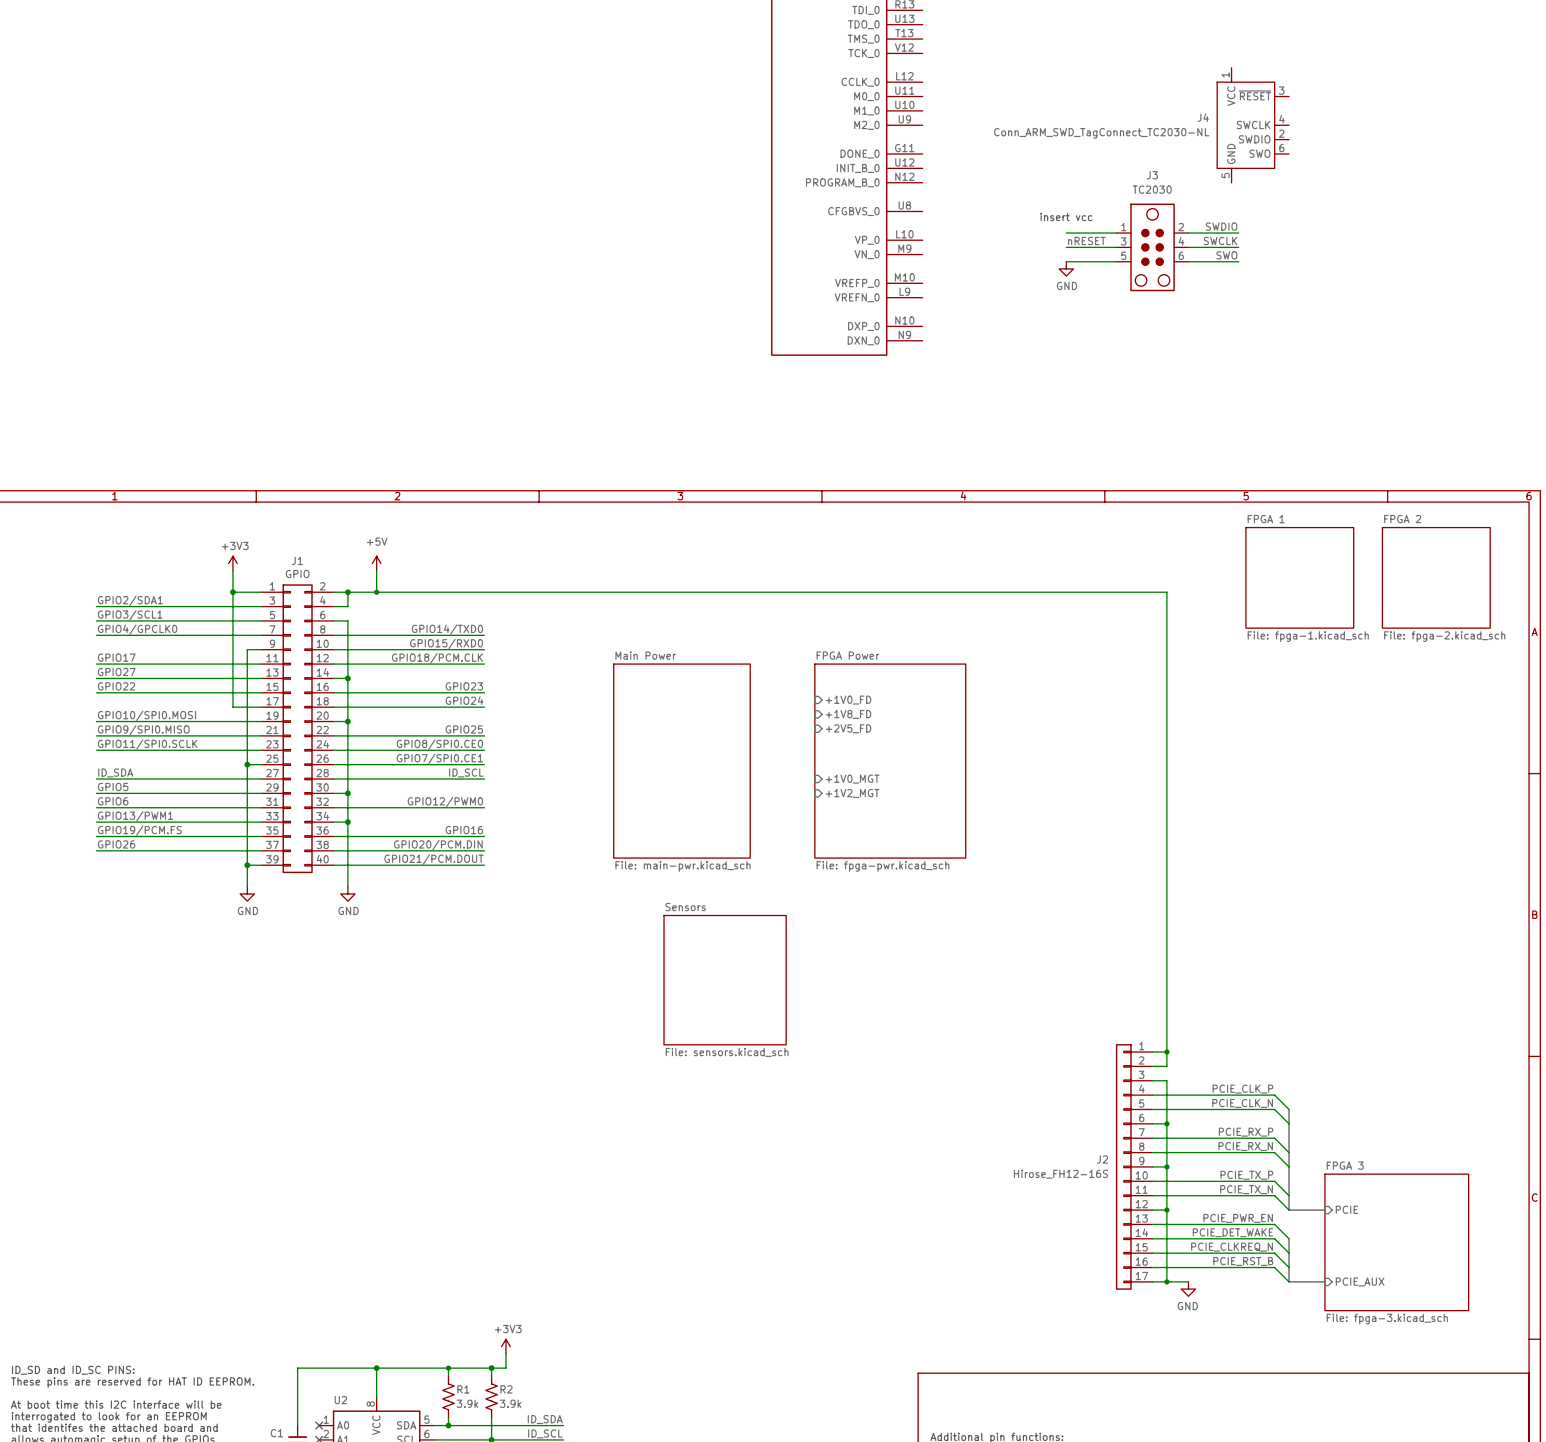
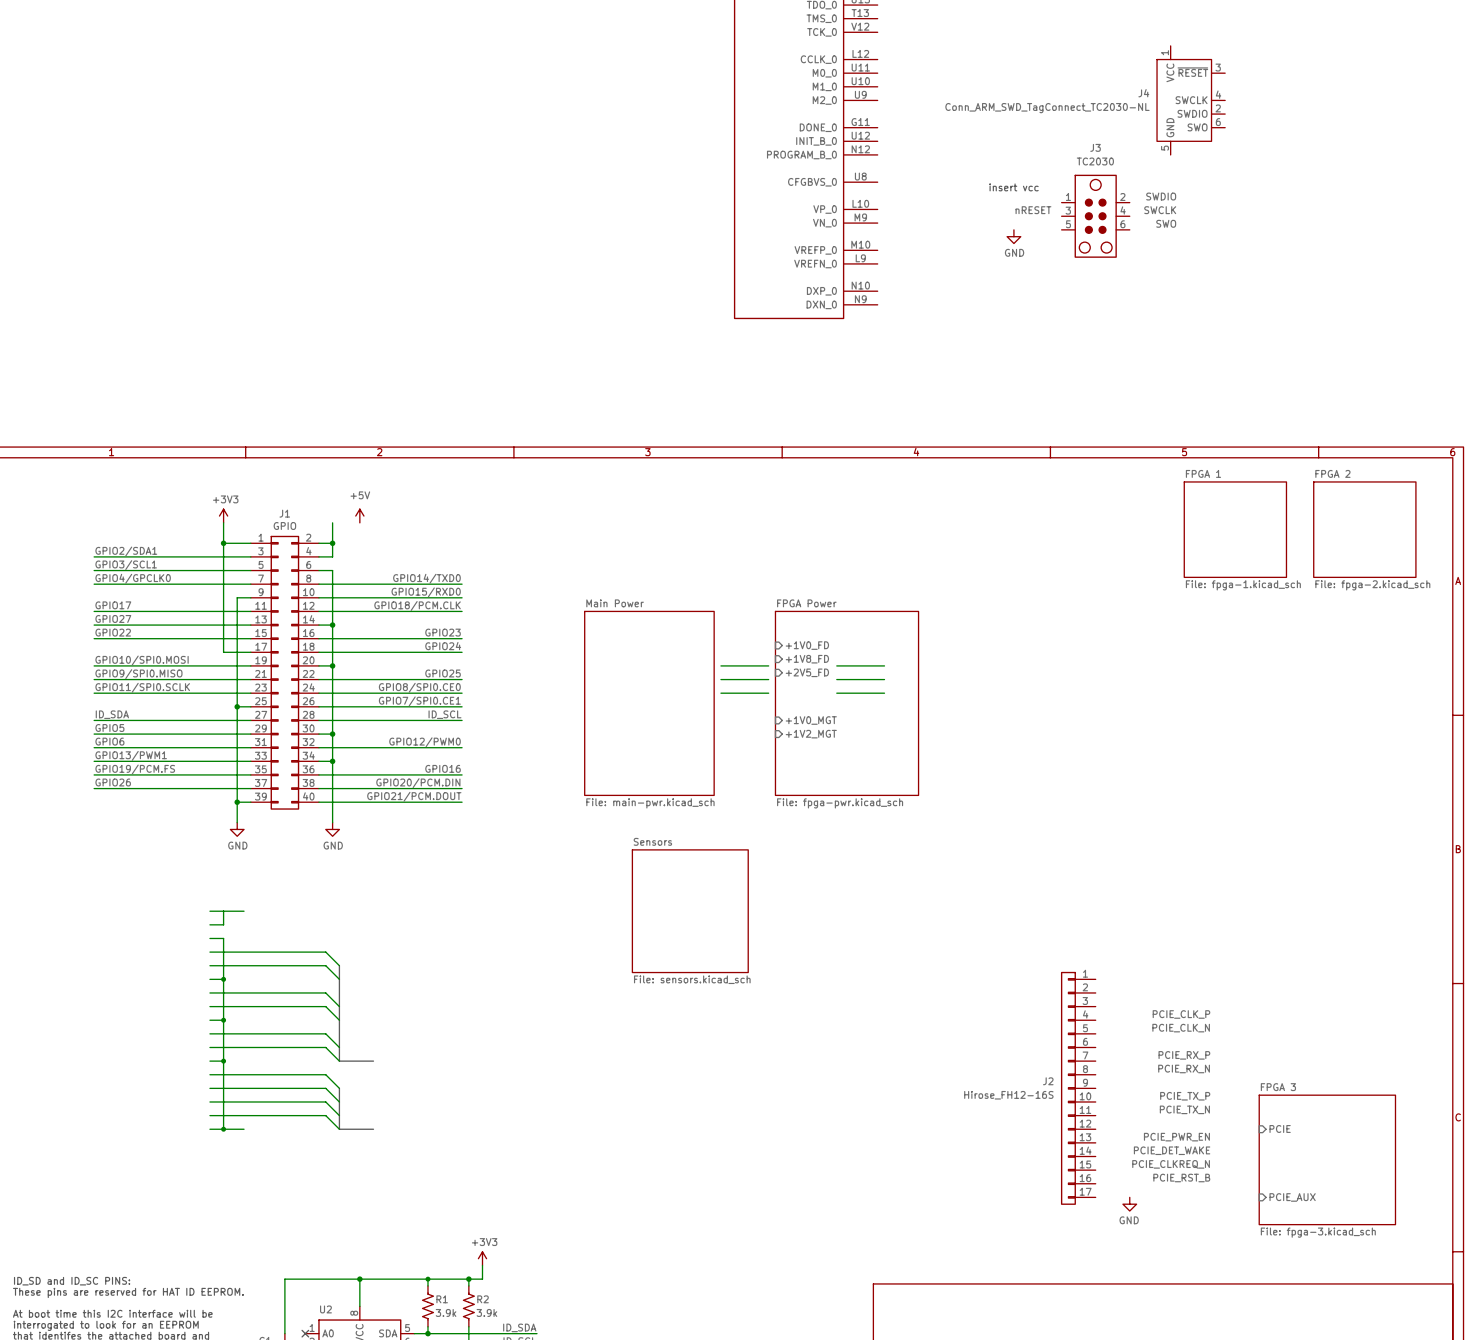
wire: (1066, 233) (1116, 233) -> none
wire: (1188, 233) (1238, 233) -> none
wire: (1066, 247) (1116, 247) -> none
wire: (1188, 247) (1238, 247) -> none
wire: (1066, 261) (1116, 261) -> none
wire: (1188, 261) (1238, 261) -> none
wire: (376, 570) (376, 592) -> none
wire: (347, 592) (1166, 592) (1166, 1066) (1152, 1066) -> (332, 543) (332, 522)
junction: (376, 592) -> none
wire: none -> (720, 665) (768, 665)
wire: none -> (836, 665) (884, 665)
wire: none -> (720, 679) (768, 679)
wire: none -> (836, 679) (884, 679)
wire: none -> (720, 693) (768, 693)
wire: none -> (836, 693) (884, 693)
wire: none -> (209, 911) (244, 911)
wire: none -> (223, 911) (223, 924) (209, 924)
wire: none -> (209, 938) (223, 938) (223, 1129)
wire: none -> (209, 952) (325, 952) (339, 965)
wire: none -> (209, 965) (325, 965) (339, 979)
bus: none -> (339, 965) (339, 1061) (373, 1061)
wire: none -> (209, 979) (223, 979)
junction: none -> (223, 979)
wire: (1152, 1052) (1166, 1052) -> none
junction: (1166, 1052) -> none
wire: none -> (209, 992) (325, 992) (339, 1006)
wire: none -> (209, 1006) (325, 1006) (339, 1020)
wire: (1152, 1080) (1166, 1080) (1166, 1281) -> none
wire: none -> (209, 1020) (223, 1020)
junction: none -> (223, 1020)
wire: (1152, 1095) (1274, 1095) (1289, 1109) -> none
wire: none -> (209, 1033) (325, 1033) (339, 1047)
wire: (1152, 1109) (1274, 1109) (1289, 1123) -> none
bus: (1289, 1109) (1289, 1210) (1324, 1210) -> none
wire: none -> (209, 1047) (325, 1047) (339, 1061)
wire: (1152, 1123) (1166, 1123) -> none
junction: (1166, 1123) -> none
wire: none -> (209, 1061) (223, 1061)
junction: none -> (223, 1061)
wire: (1152, 1138) (1274, 1138) (1289, 1152) -> none
wire: none -> (209, 1074) (325, 1074) (339, 1088)
wire: (1152, 1152) (1274, 1152) (1289, 1166) -> none
wire: none -> (209, 1088) (325, 1088) (339, 1101)
bus: none -> (339, 1088) (339, 1129) (373, 1129)
wire: (1152, 1166) (1166, 1166) -> none
junction: (1166, 1166) -> none
wire: none -> (209, 1101) (325, 1101) (339, 1115)
wire: (1152, 1181) (1274, 1181) (1289, 1195) -> none
wire: none -> (209, 1115) (325, 1115) (339, 1129)
wire: (1152, 1195) (1274, 1195) (1289, 1210) -> none
wire: none -> (209, 1129) (244, 1129)
junction: none -> (223, 1129)
wire: (1152, 1210) (1166, 1210) -> none
junction: (1166, 1210) -> none
wire: (1152, 1224) (1274, 1224) (1289, 1238) -> none
wire: (1152, 1238) (1274, 1238) (1289, 1253) -> none
bus: (1289, 1238) (1289, 1281) (1324, 1281) -> none
wire: (1152, 1253) (1274, 1253) (1289, 1267) -> none
wire: (1152, 1267) (1274, 1267) (1289, 1281) -> none
wire: (1152, 1281) (1188, 1281) -> none
junction: (1166, 1281) -> none

